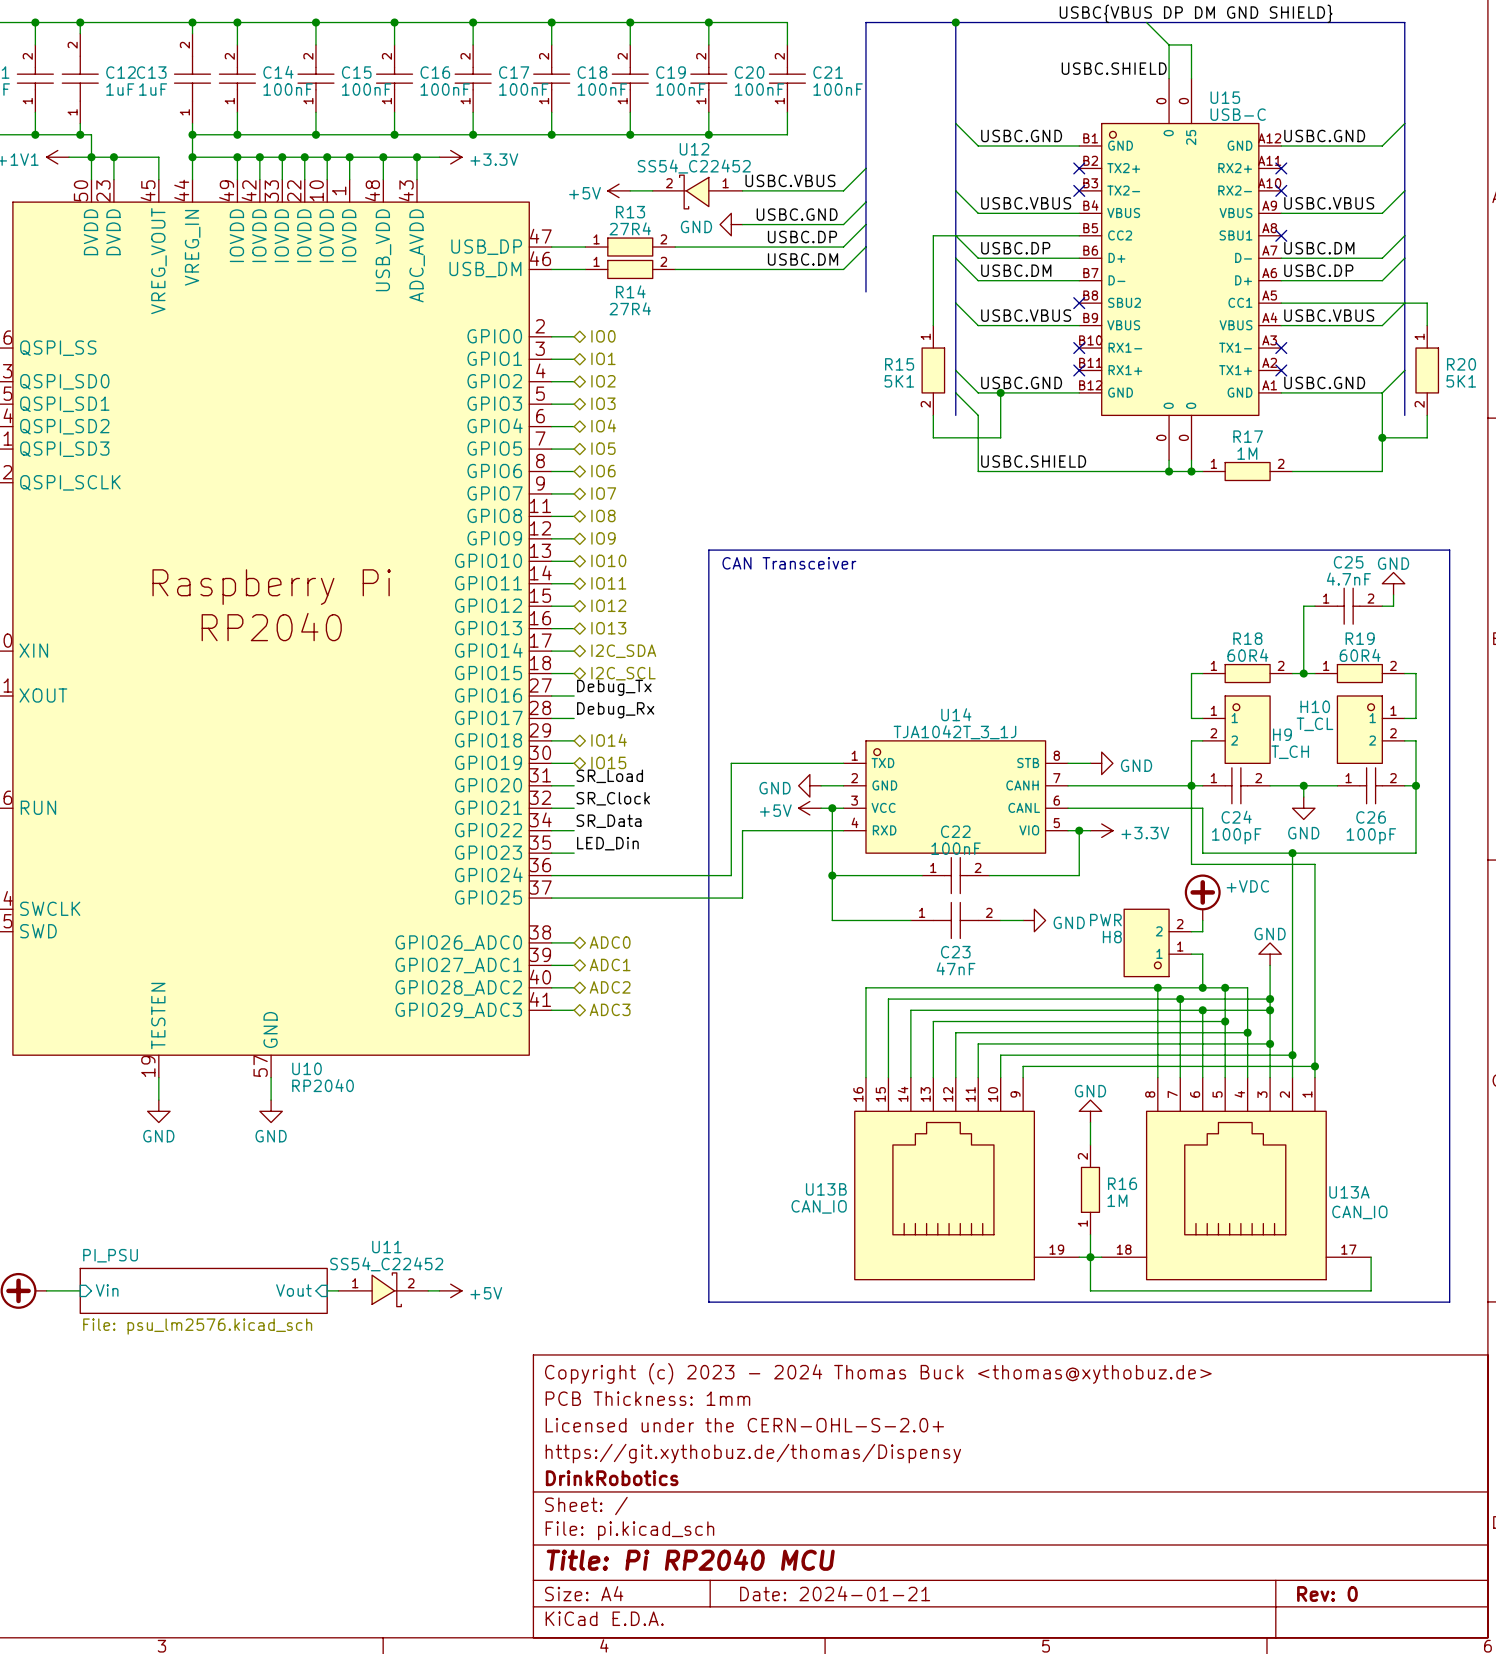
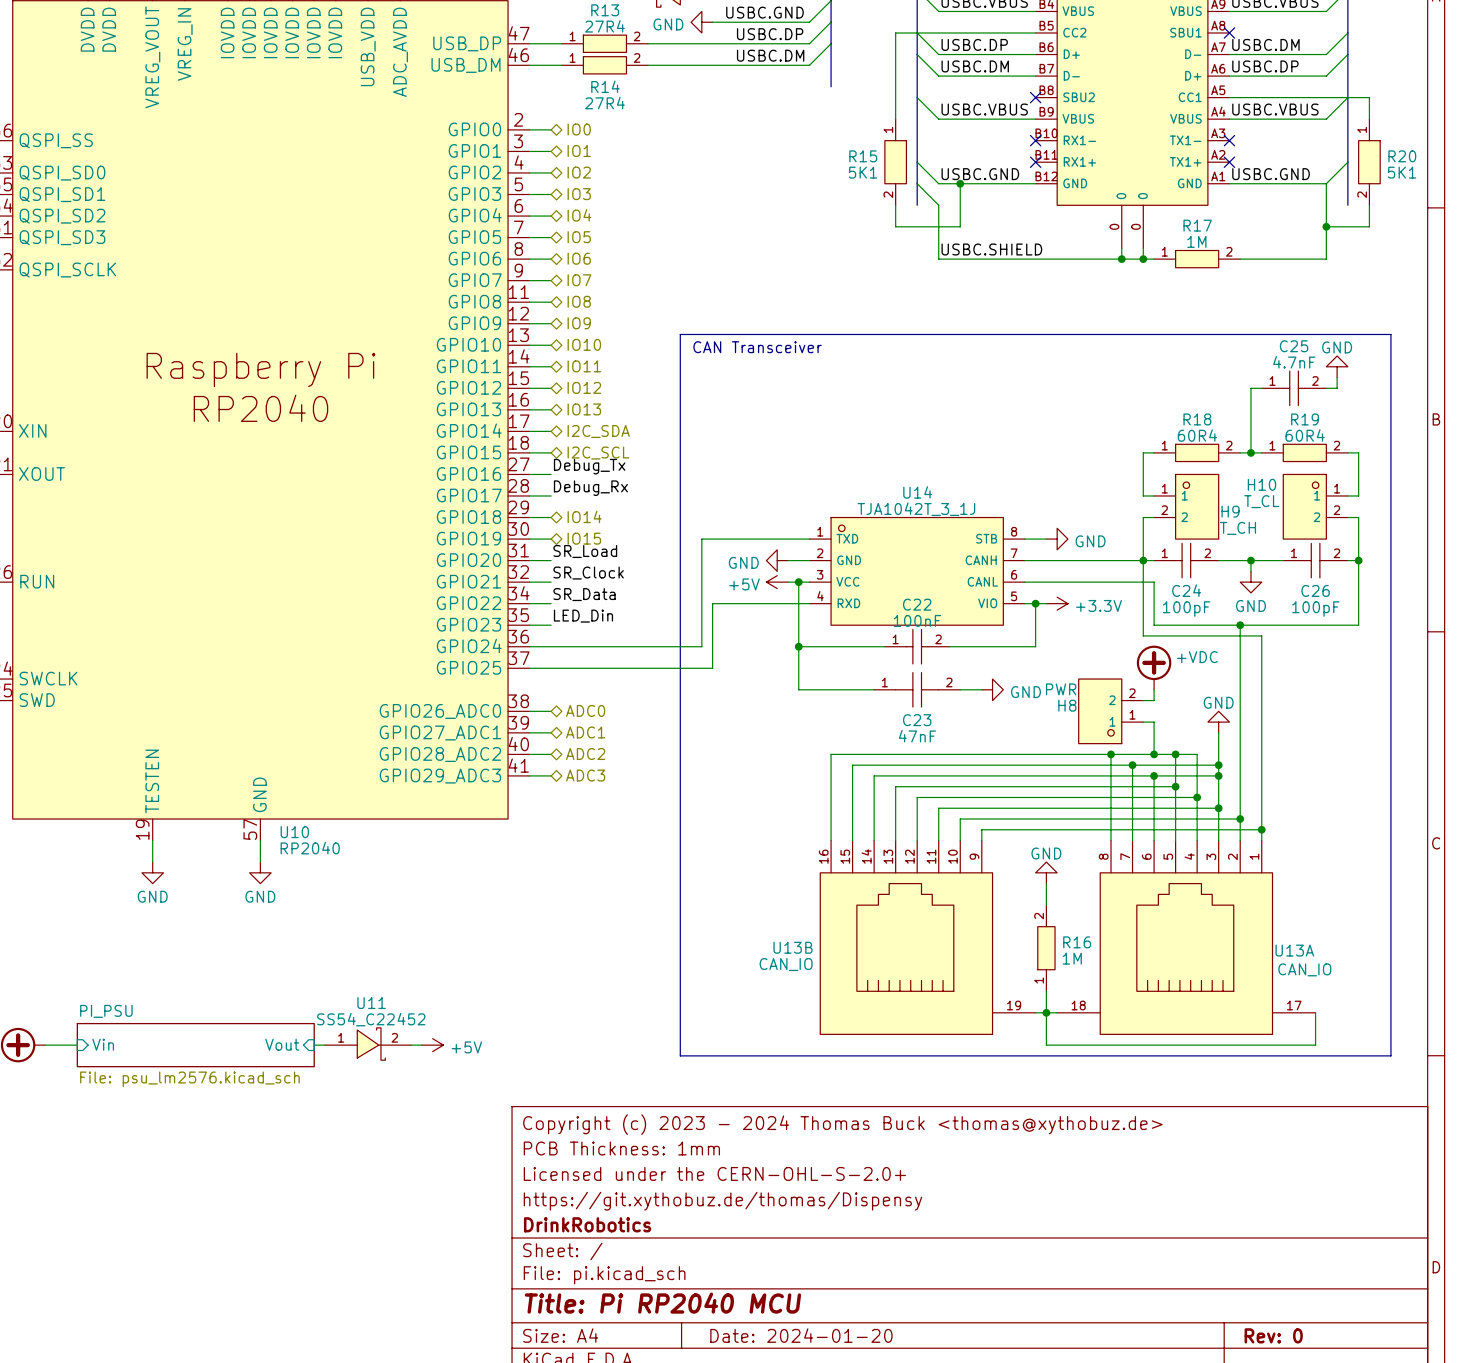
title block: Date: 2024-01-21 (835, 1593) -> Date: 2024-01-20 (801, 1335)

